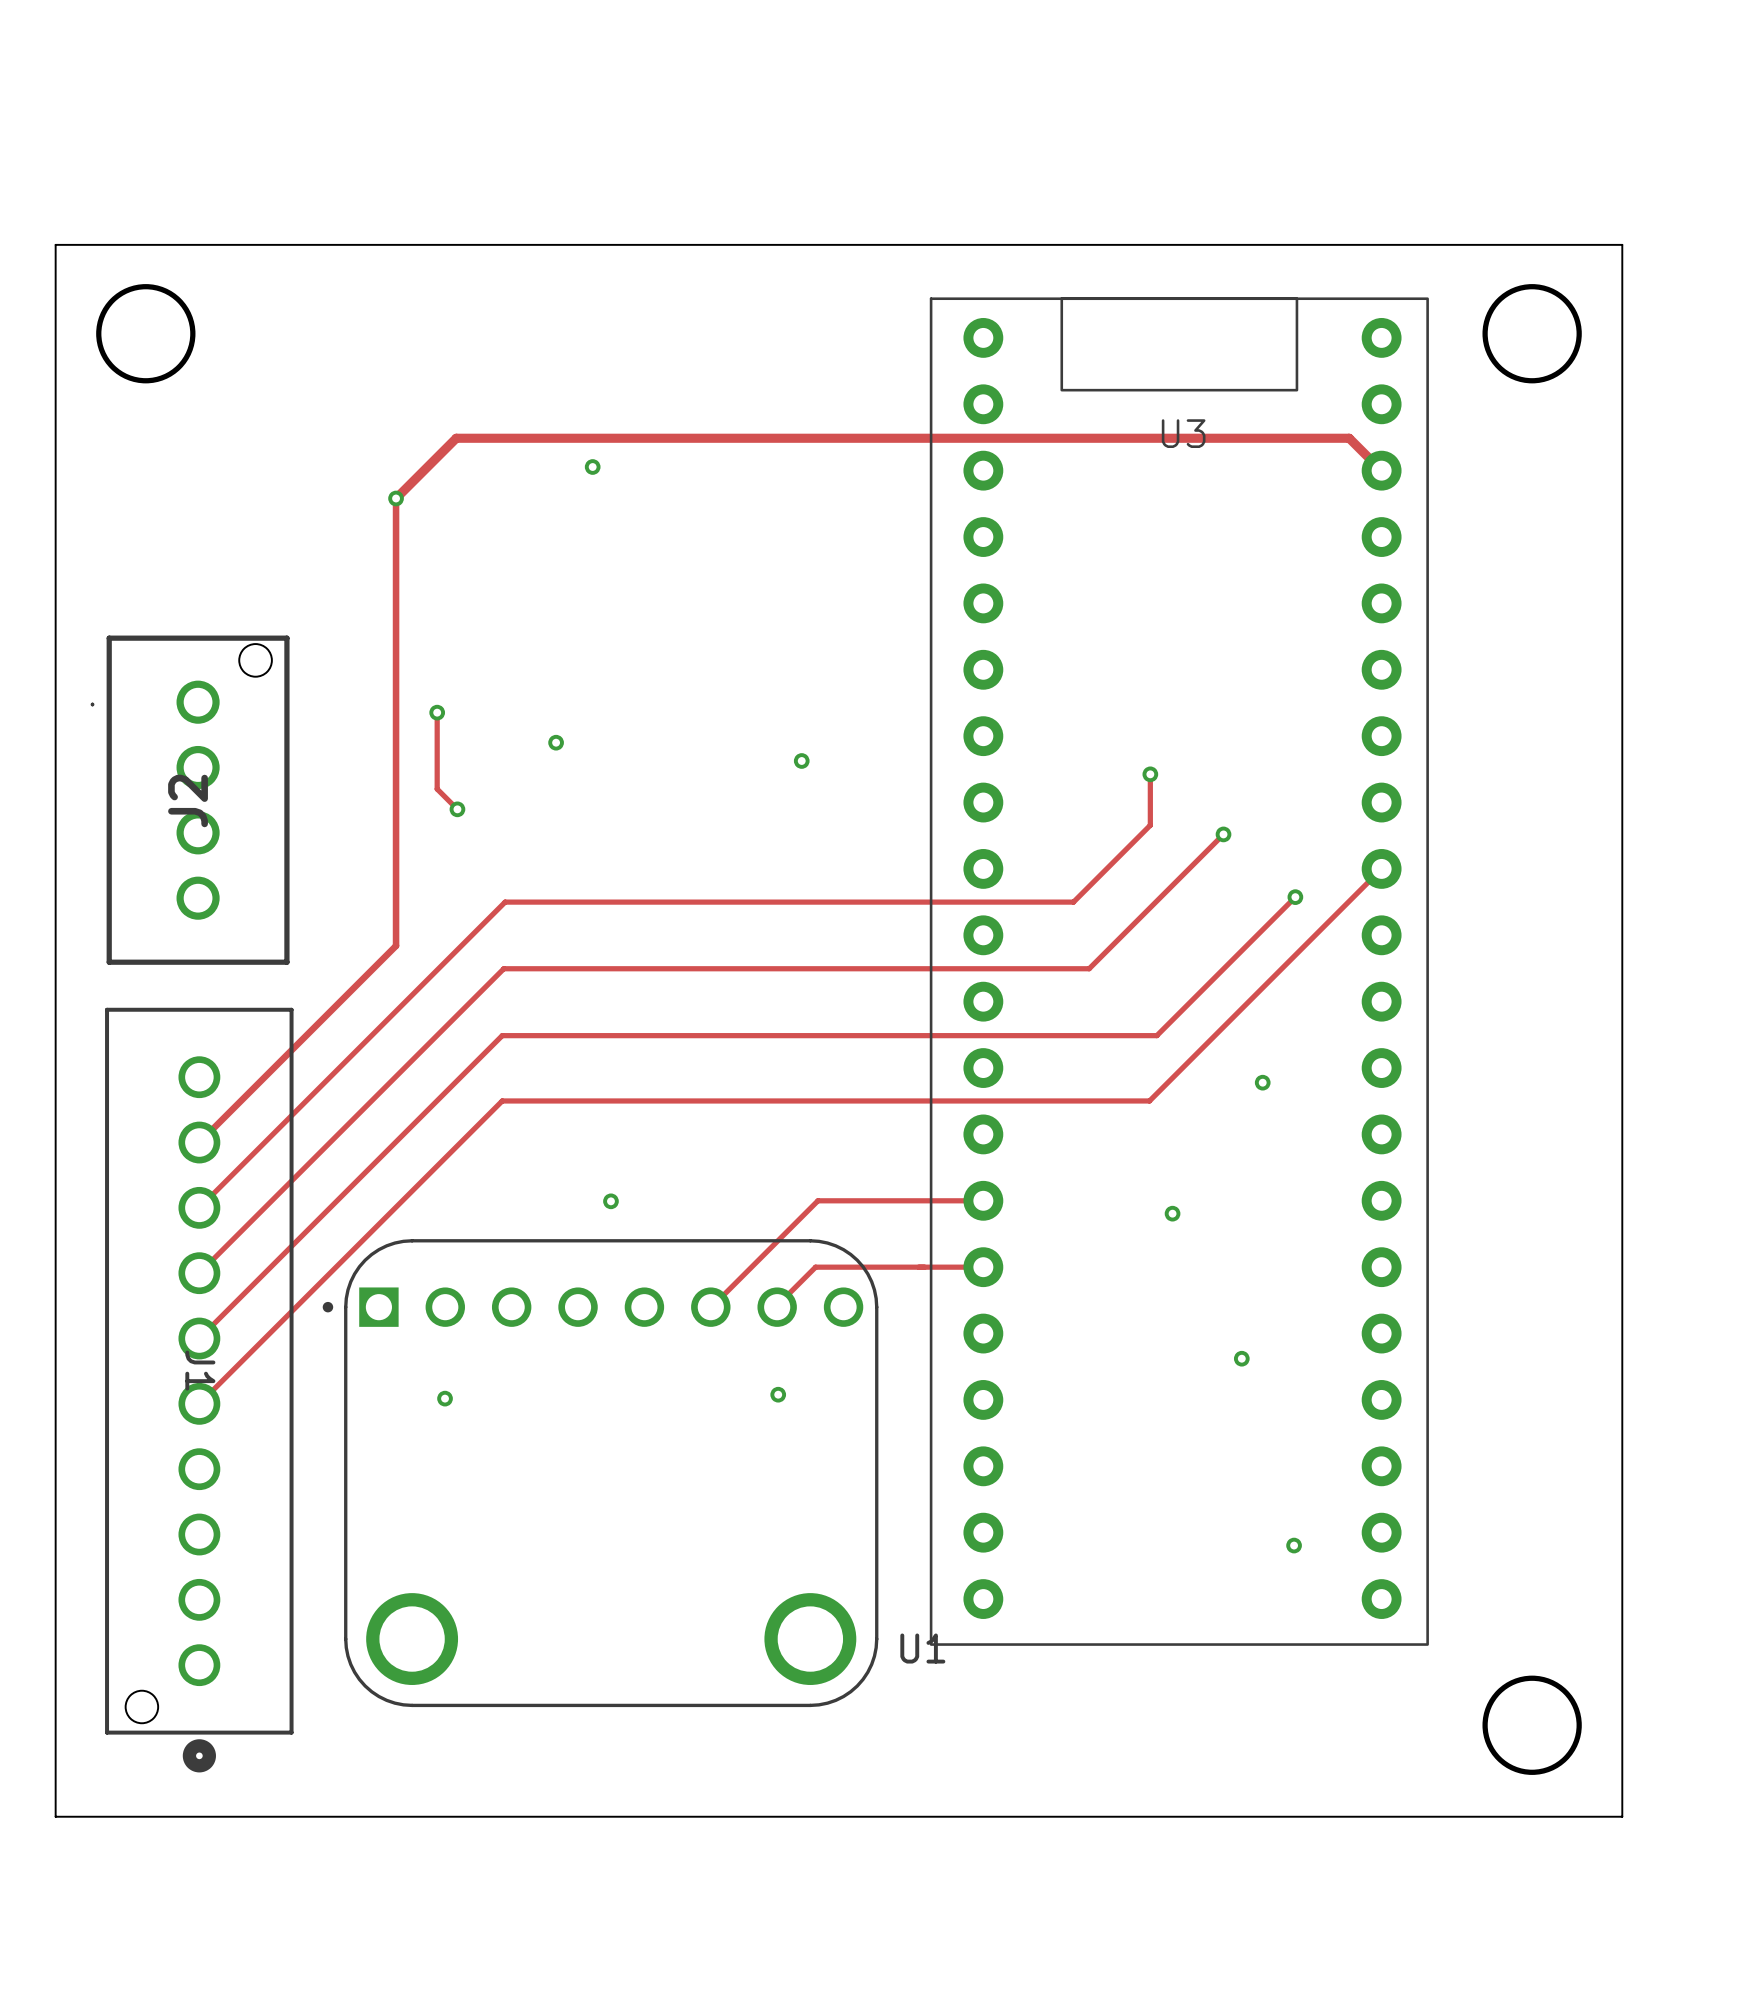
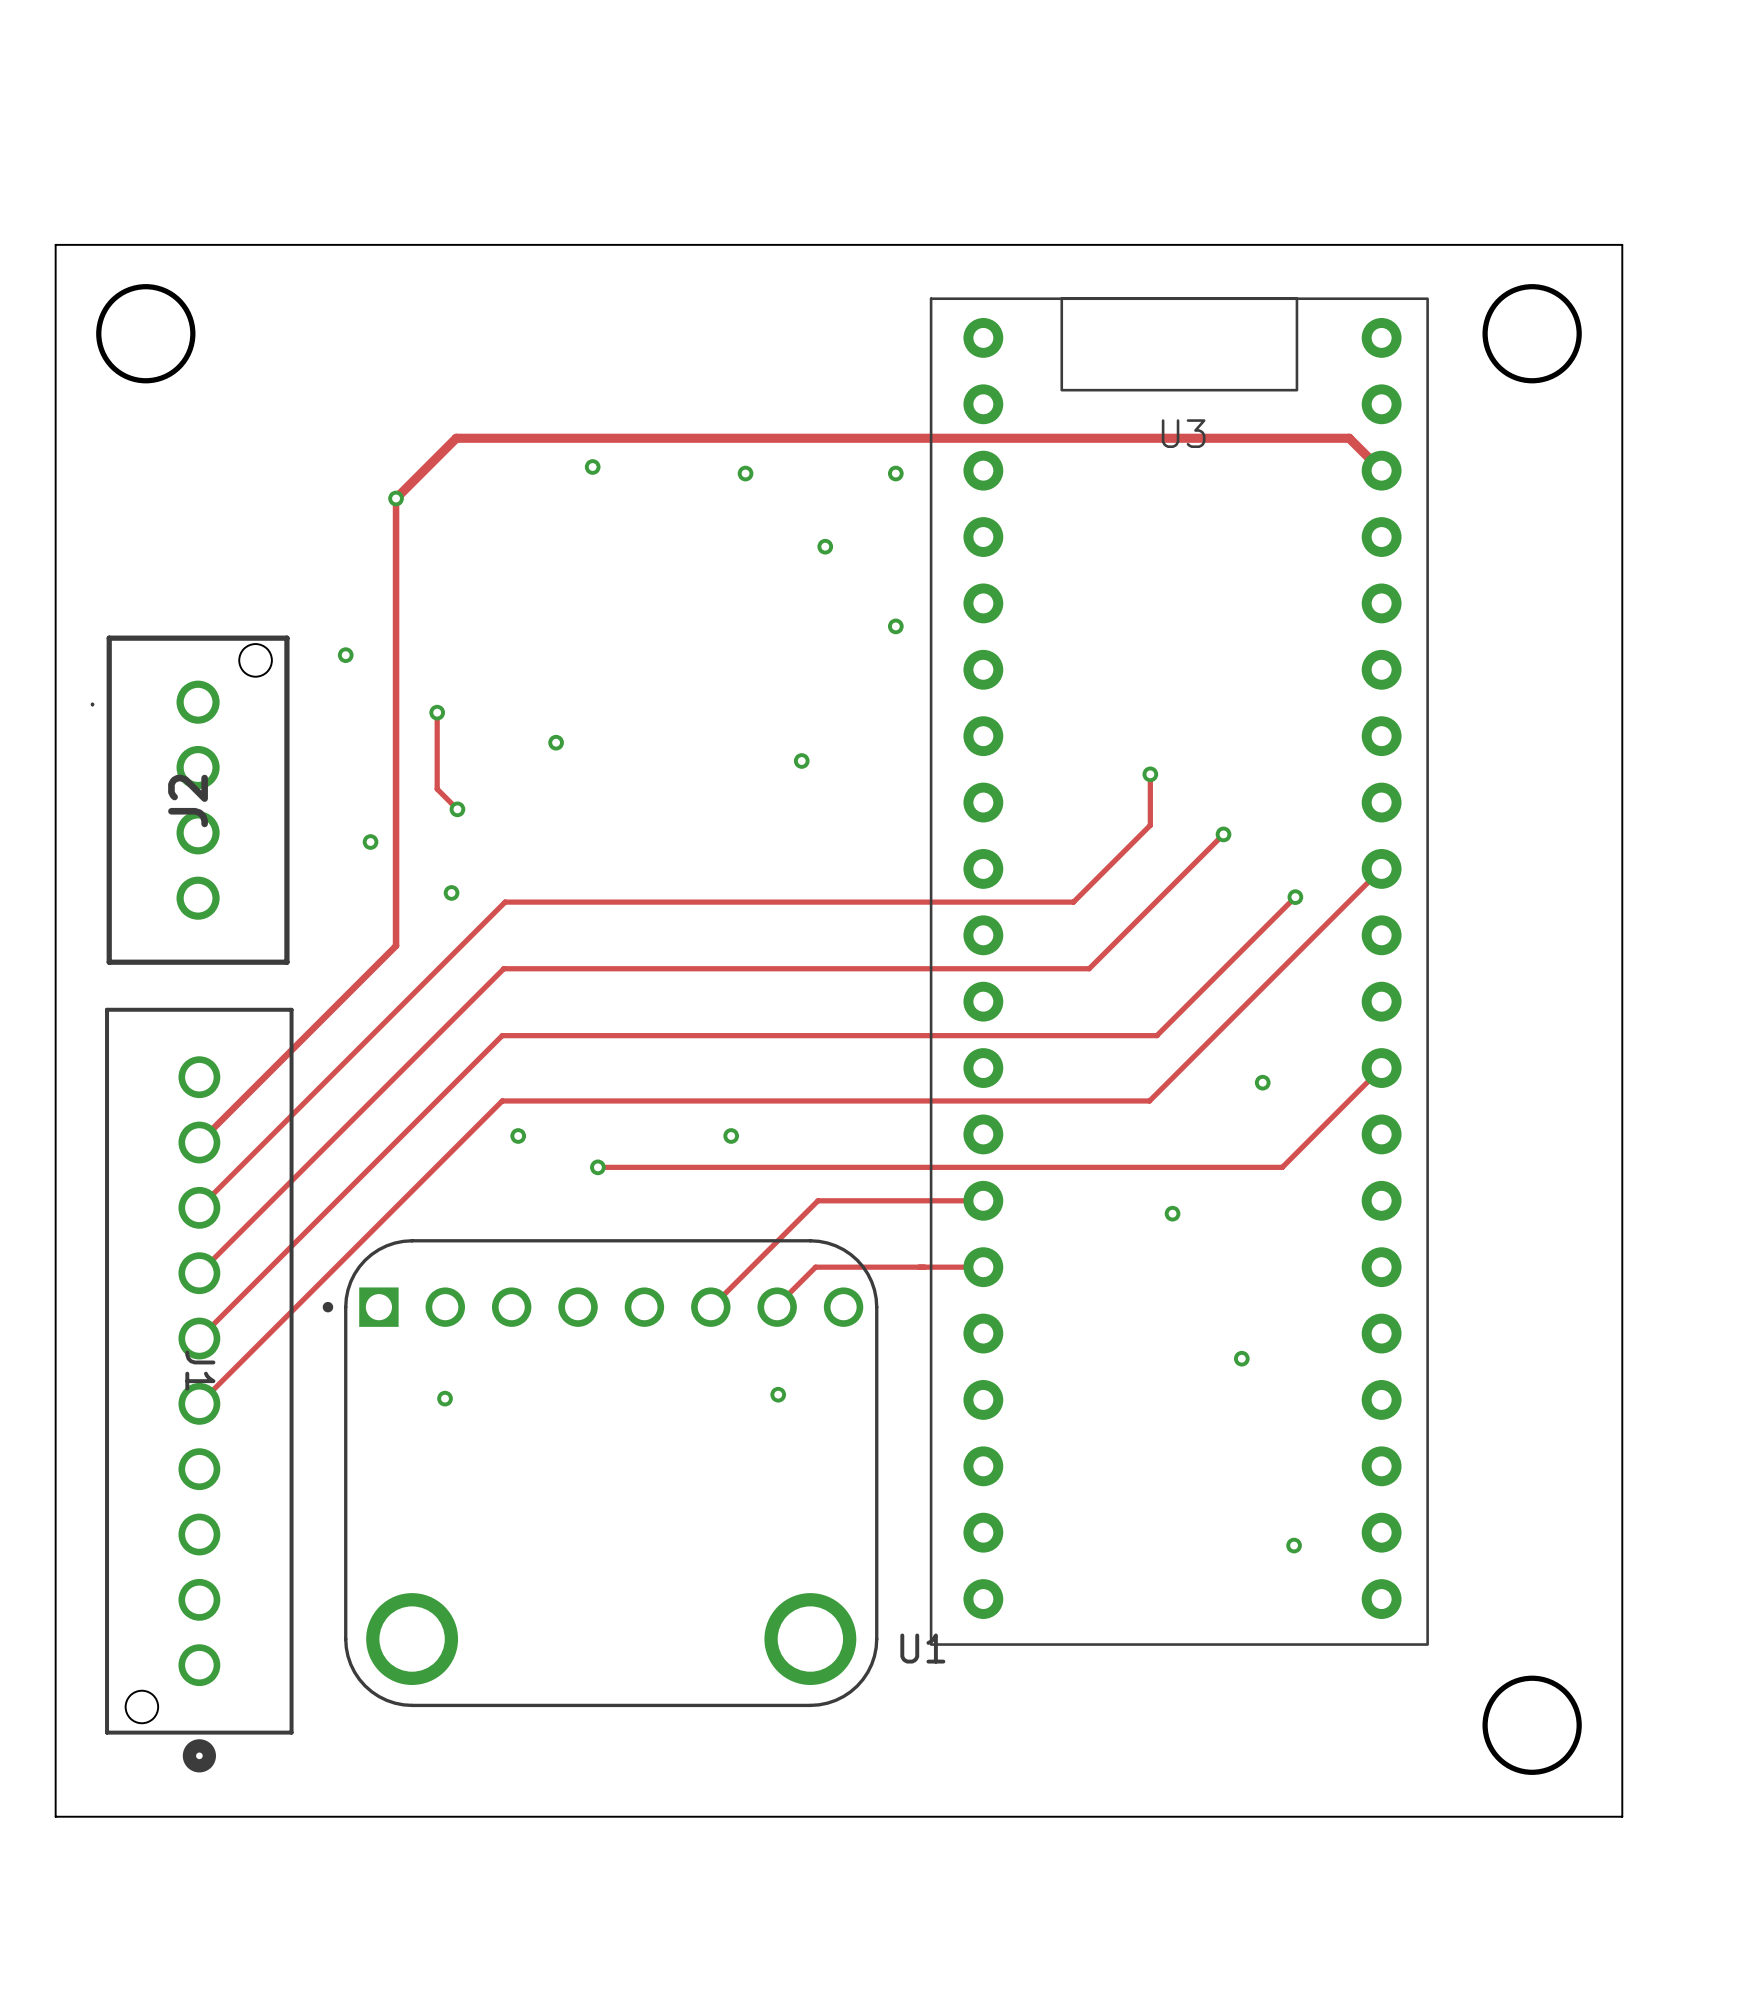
via: none -> (745, 473)
via: none -> (895, 473)
via: none -> (825, 546)
via: none -> (895, 626)
via: none -> (345, 655)
via: none -> (370, 842)
via: none -> (451, 892)
track: none -> (1381, 1068) (1282, 1167) (597, 1167)
via: none -> (518, 1135)
via: none -> (731, 1135)
via position: (610, 1201) -> (597, 1167)

